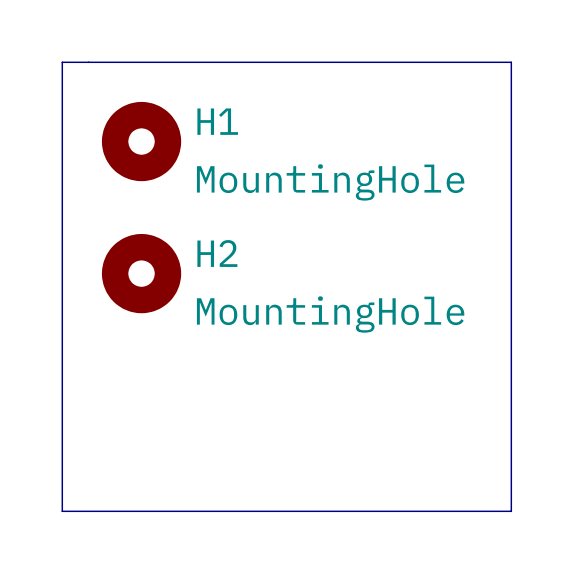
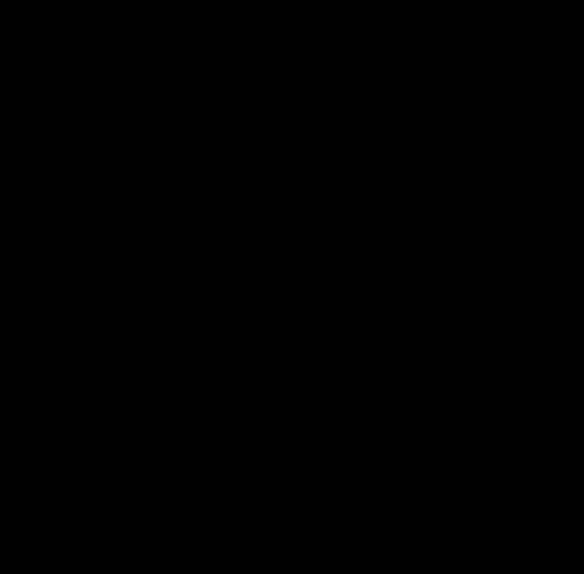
line: (62, 62) (511, 62) (511, 511) (62, 511) (62, 62) -> none
H1: MountingHole (141, 141) -> none
H2: MountingHole (141, 273) -> none

